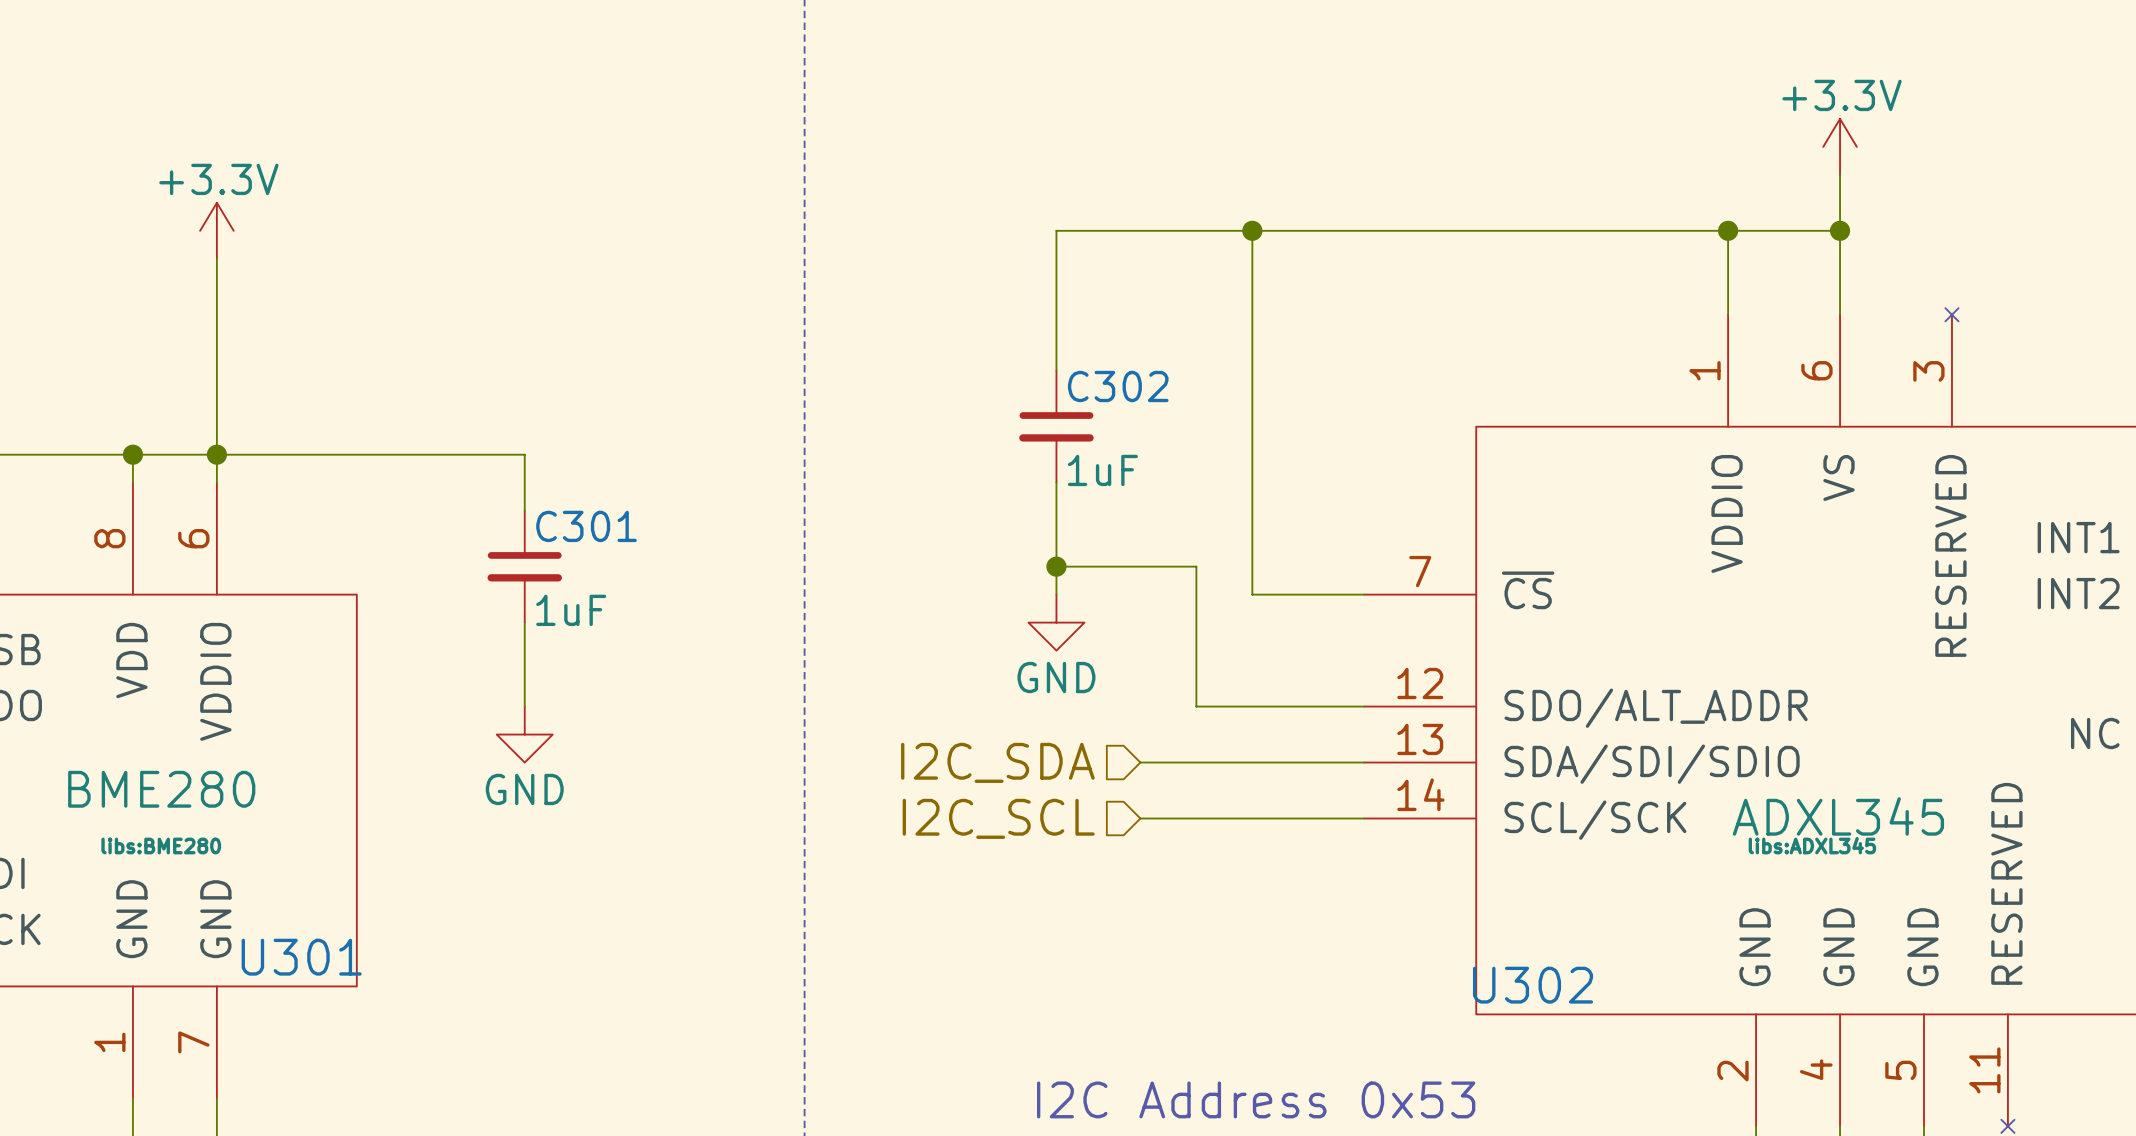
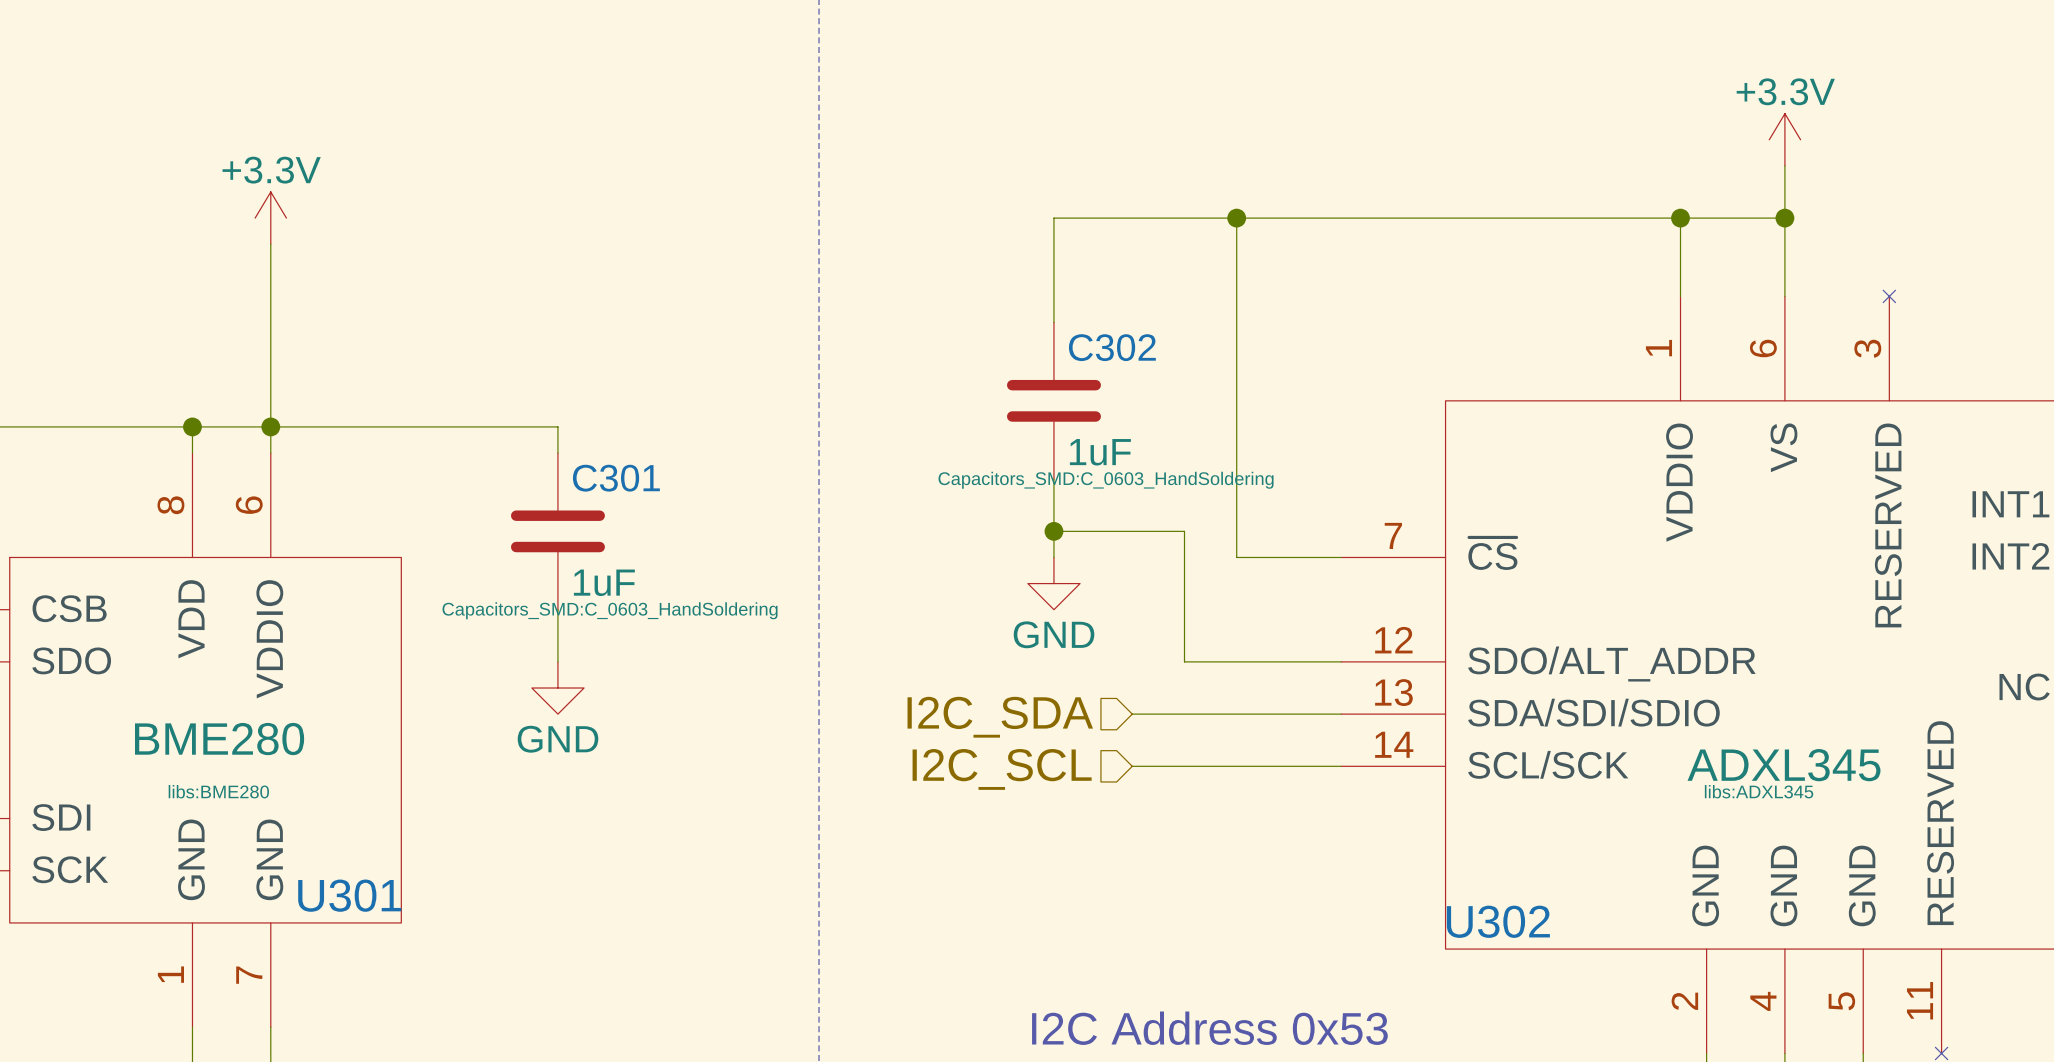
C302 symbol: [1019, 370, 1094, 483] -> [1006, 322, 1101, 480]
C301 symbol: [487, 510, 562, 623] -> [510, 453, 605, 610]
C302 text: none -> Capacitors_SMD:C_0603_HandSoldering (1106, 480)
C301 text: none -> Capacitors_SMD:C_0603_HandSoldering (610, 610)

